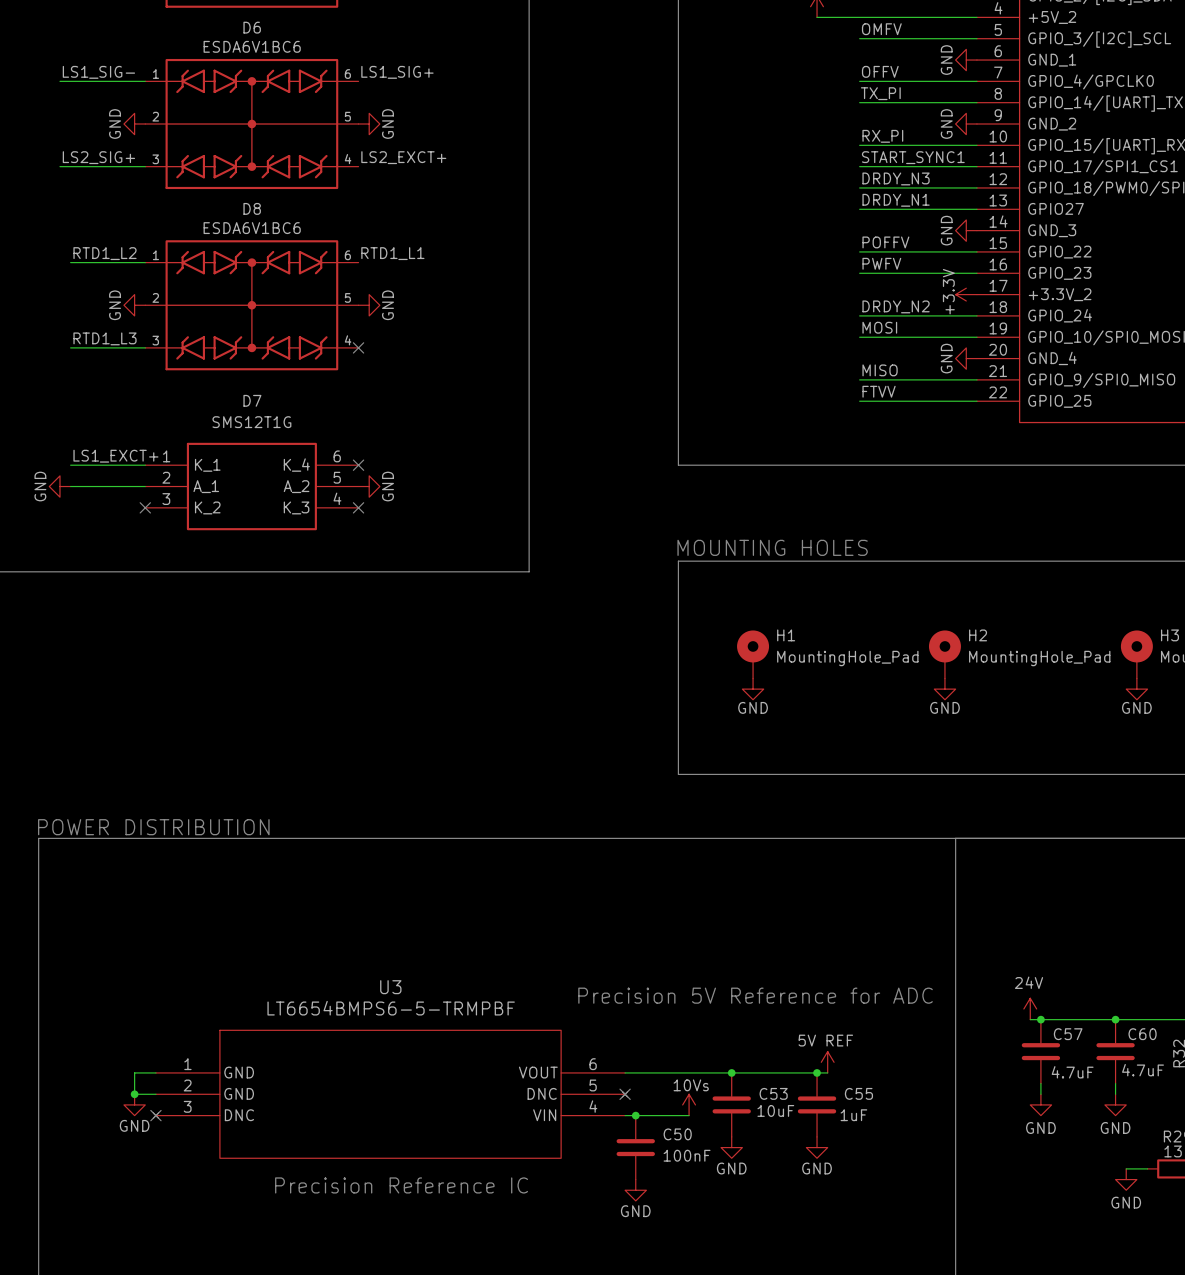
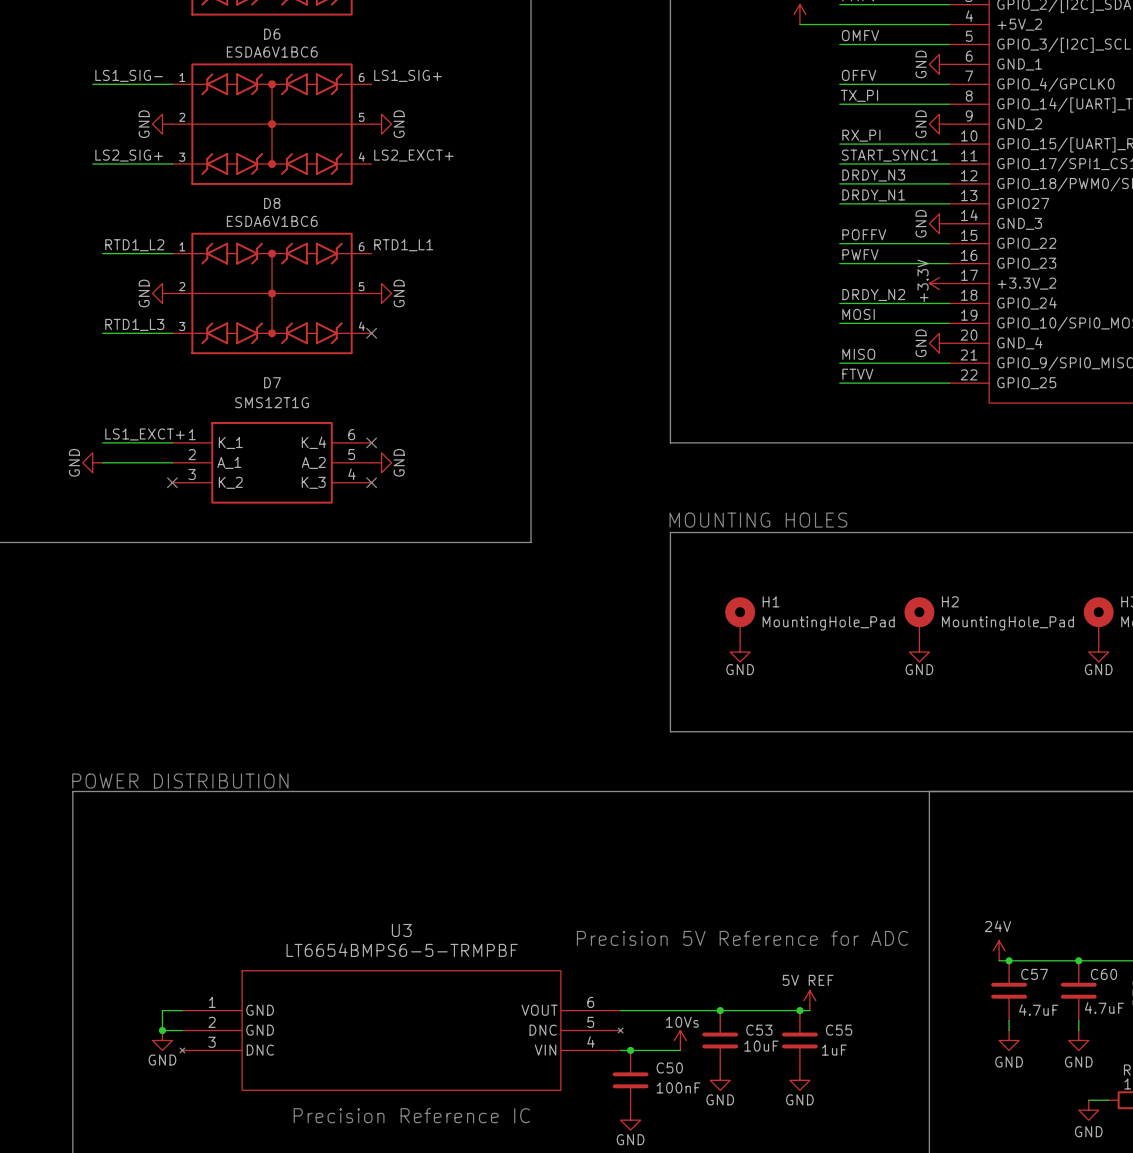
no-connect mark: (625, 1094) -> none
no-connect mark: (155, 1115) -> none

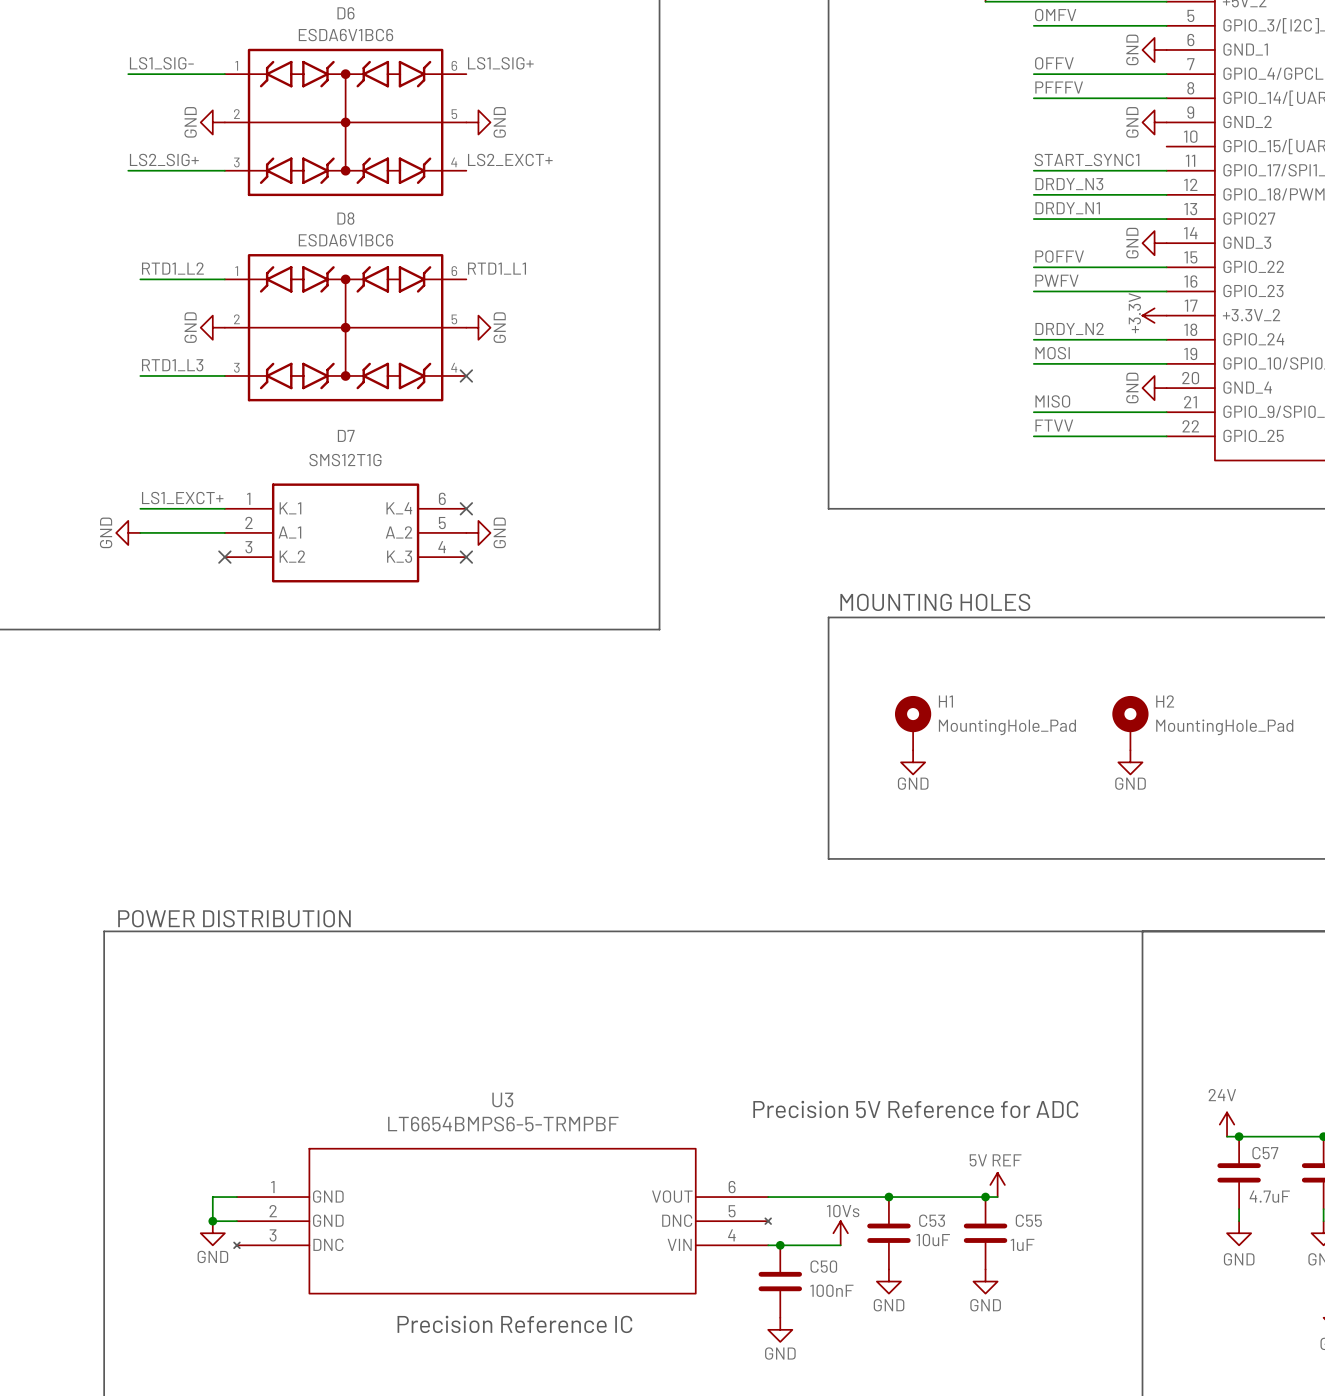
label: TX_PI (859, 95) -> PFFFV (1059, 87)
label: RX_PI (861, 135) -> none
wire: (839, 144) (949, 144) -> none

